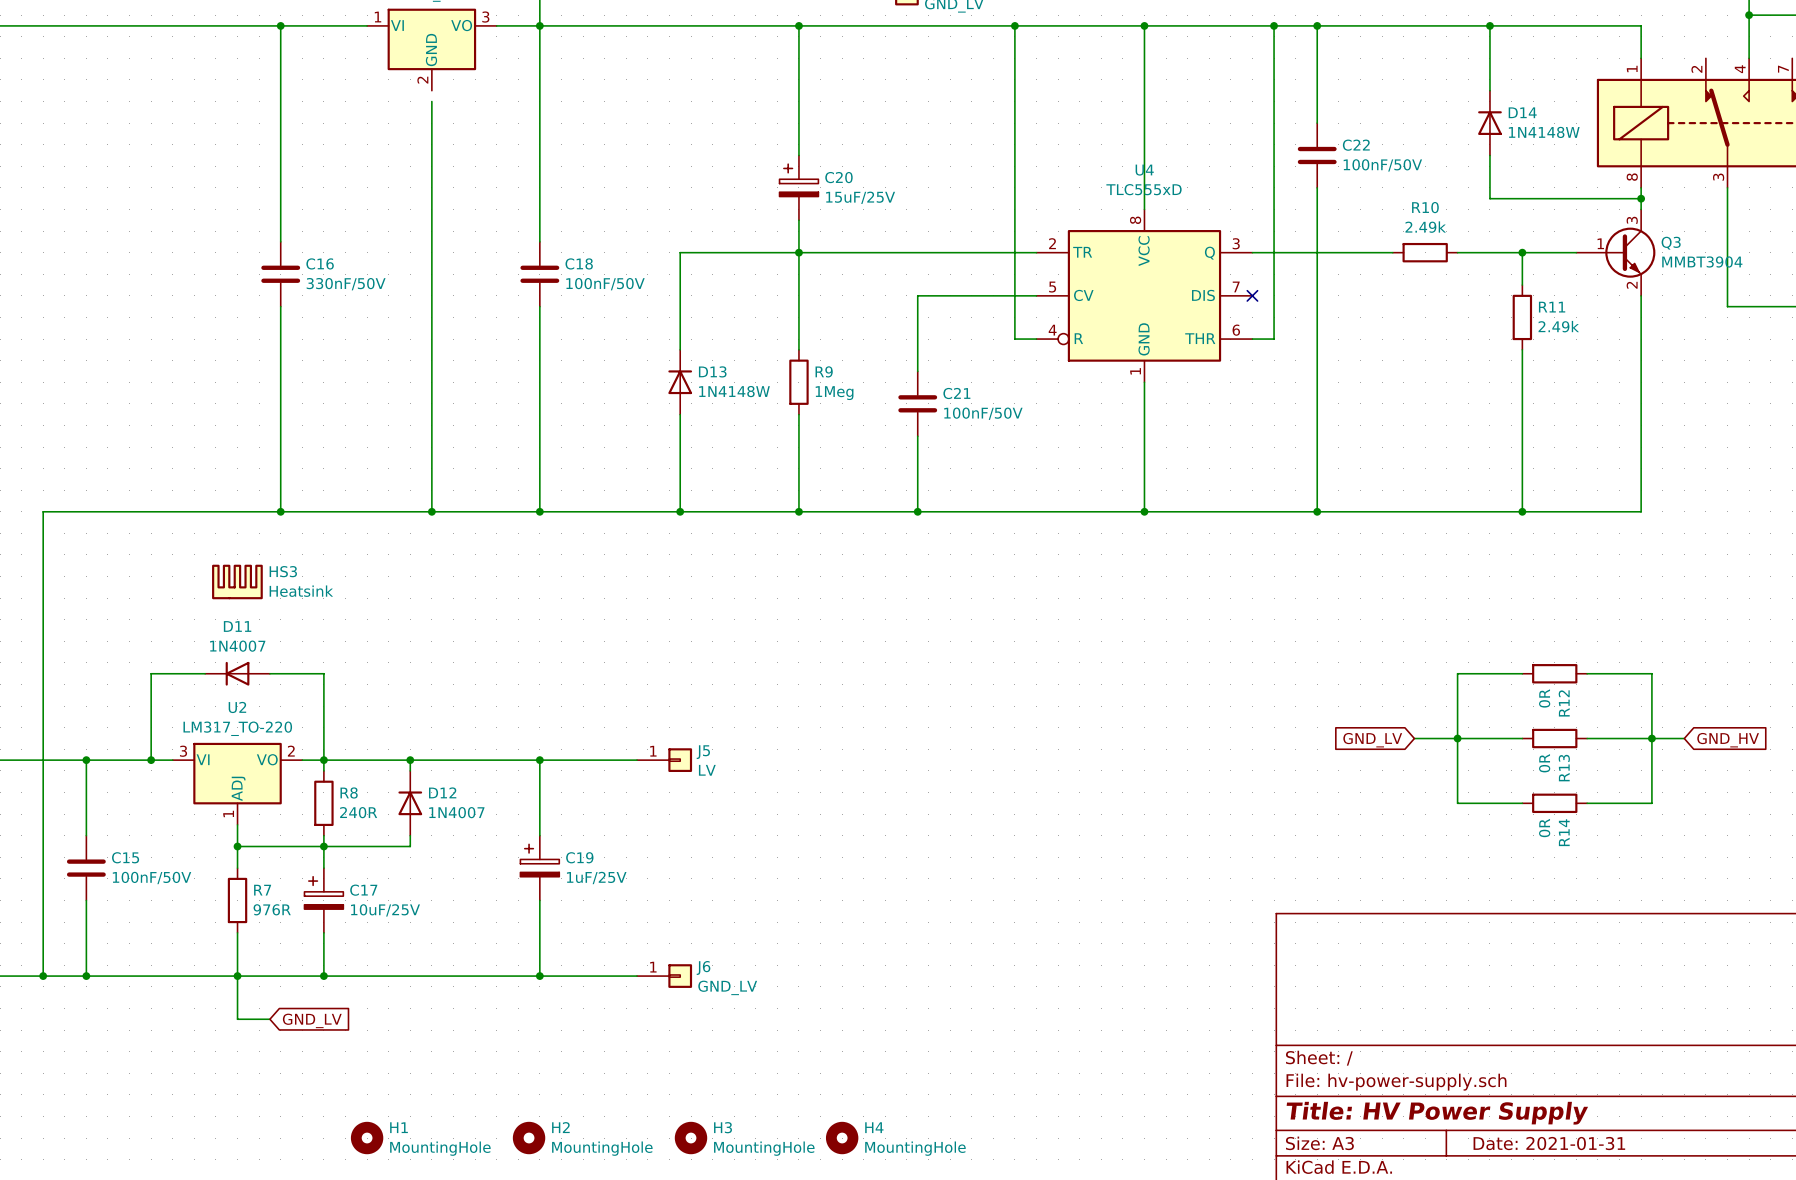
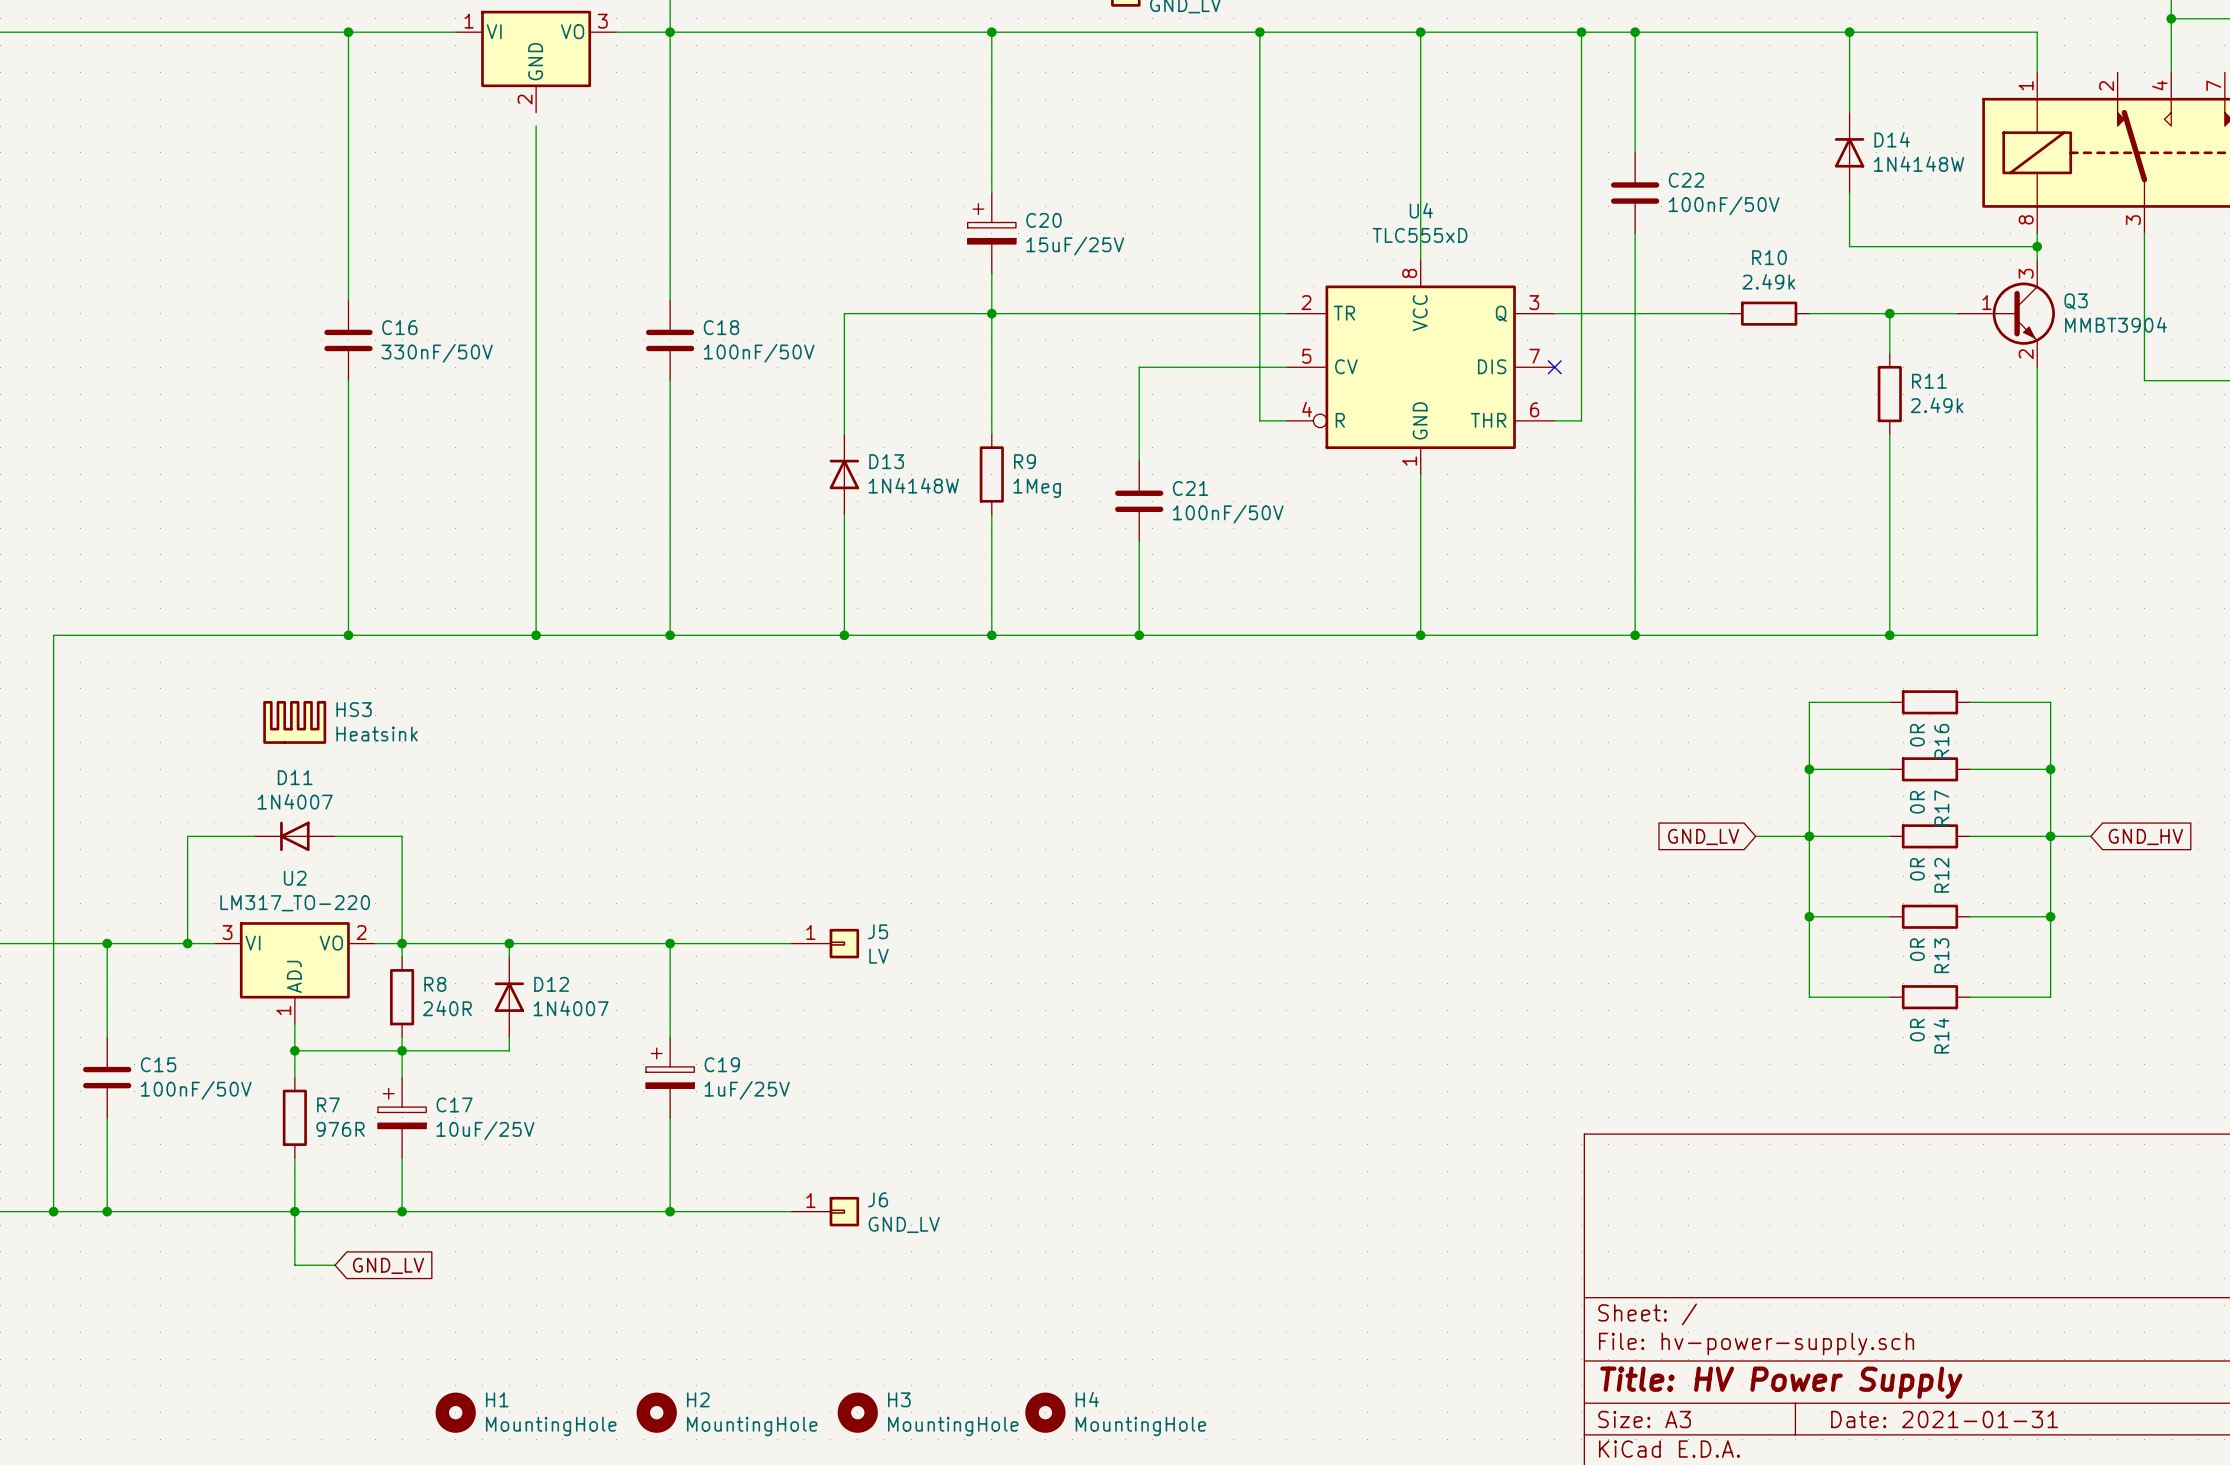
wire: none -> (1889, 702) (1809, 702) (1809, 836) (1755, 836)
R16: none -> 0R (1929, 702)
wire: none -> (1970, 702) (2050, 702) (2050, 836) (2090, 836)
wire: none -> (1809, 769) (1889, 769)
junction: none -> (1809, 769)
R17: none -> 0R (1929, 769)
wire: none -> (1970, 769) (2050, 769)
junction: none -> (2050, 769)
junction: none -> (1809, 836)
junction: none -> (2050, 836)
wire: (1414, 738) (1457, 738) -> none
wire: (1651, 738) (1684, 738) -> none
global label position: GND_LV (1372, 740) -> GND_LV (1703, 837)
global label position: GND_HV (1728, 740) -> GND_HV (2145, 837)

